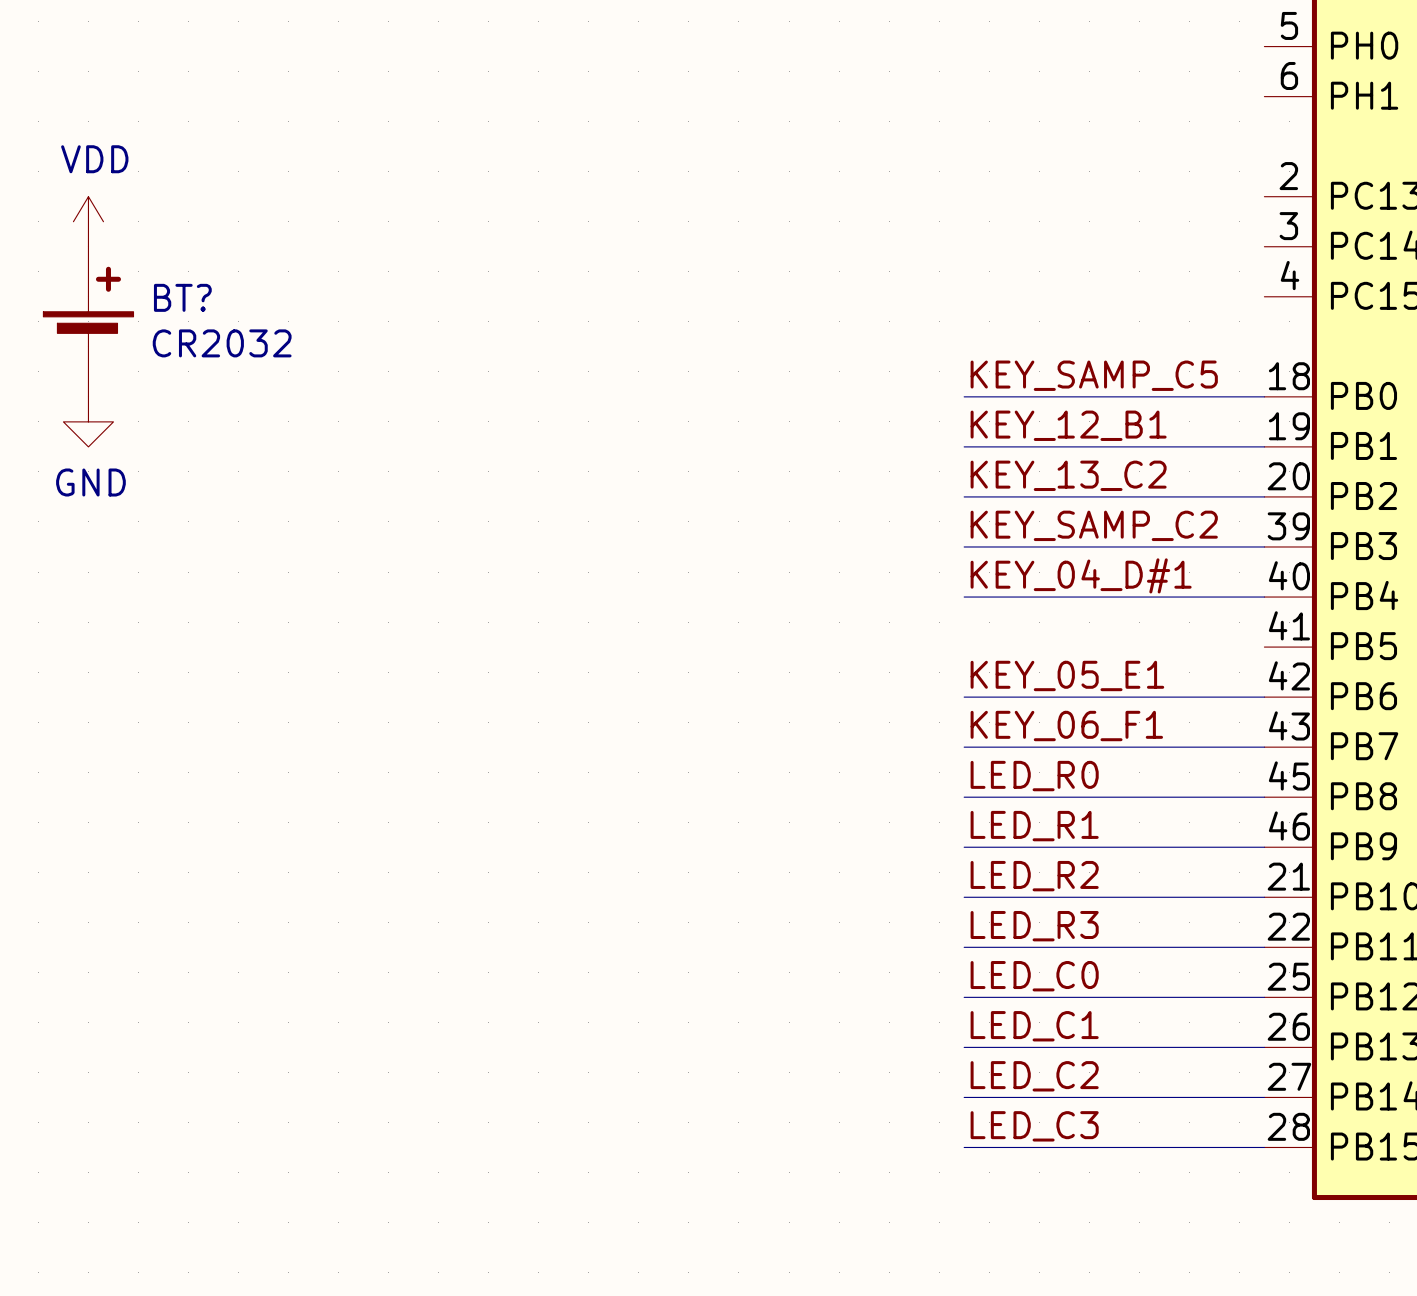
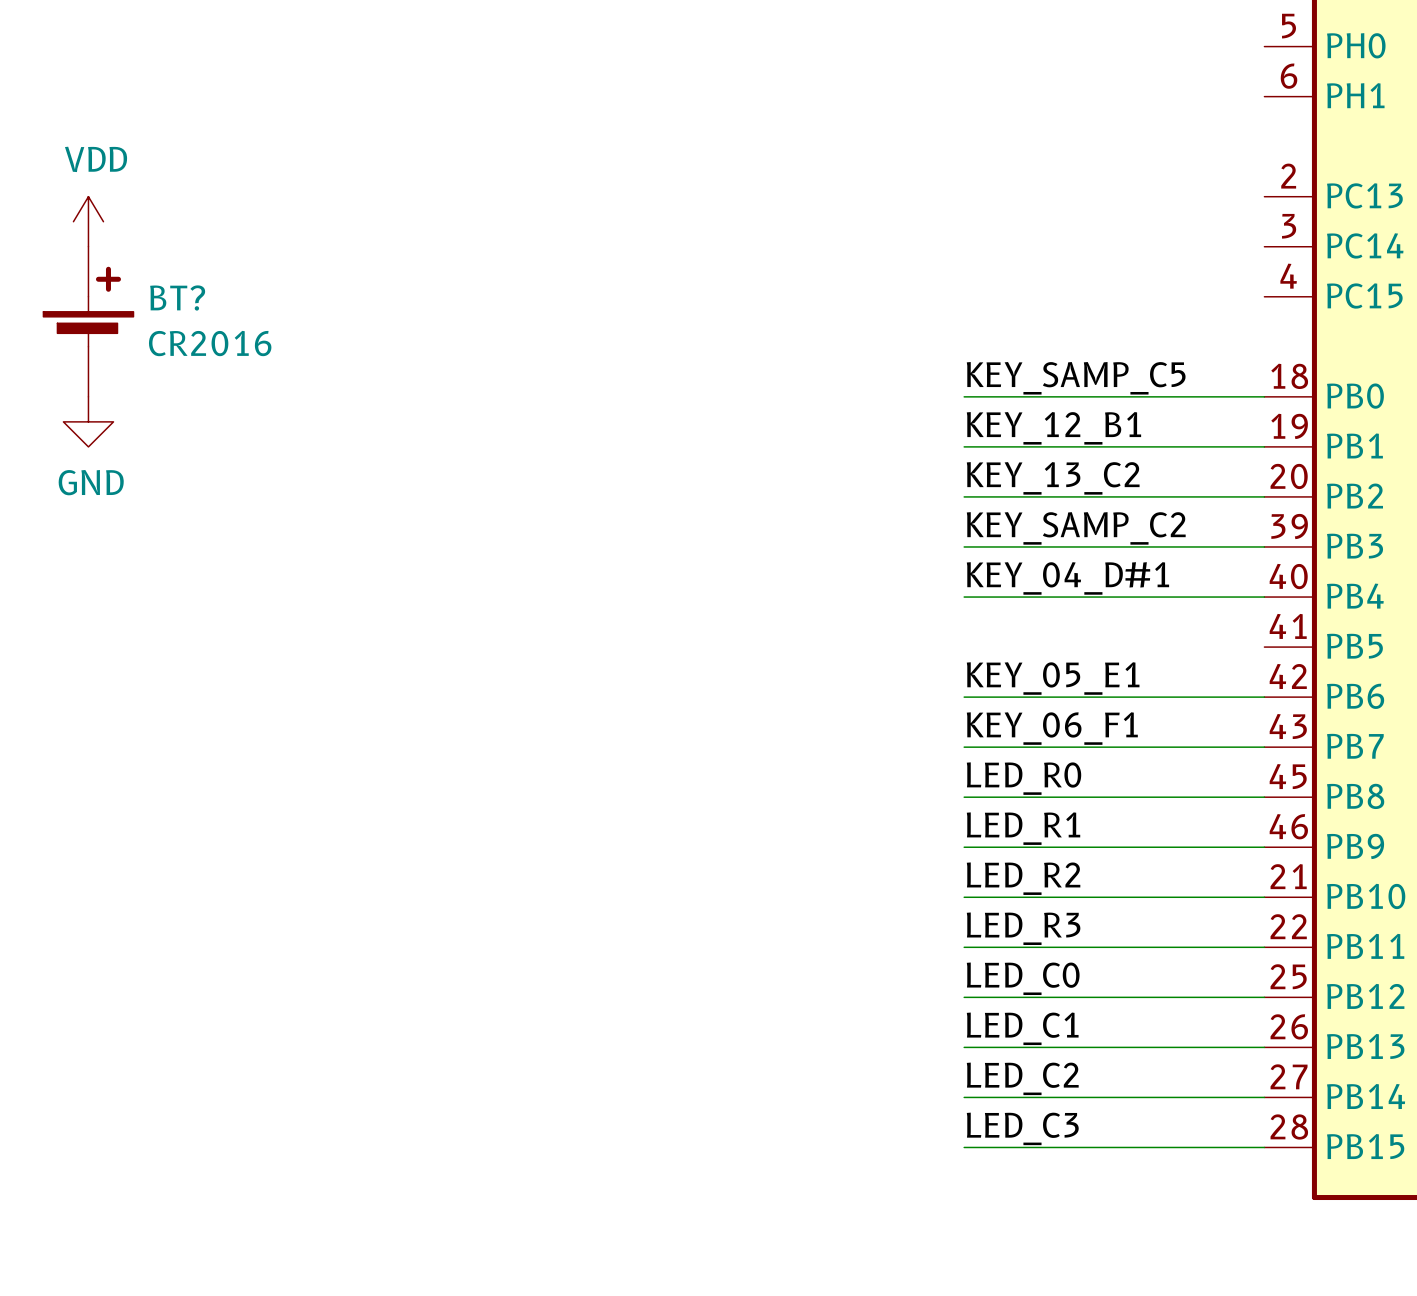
BT? value: CR2032 (222, 343) -> CR2016 (210, 343)

